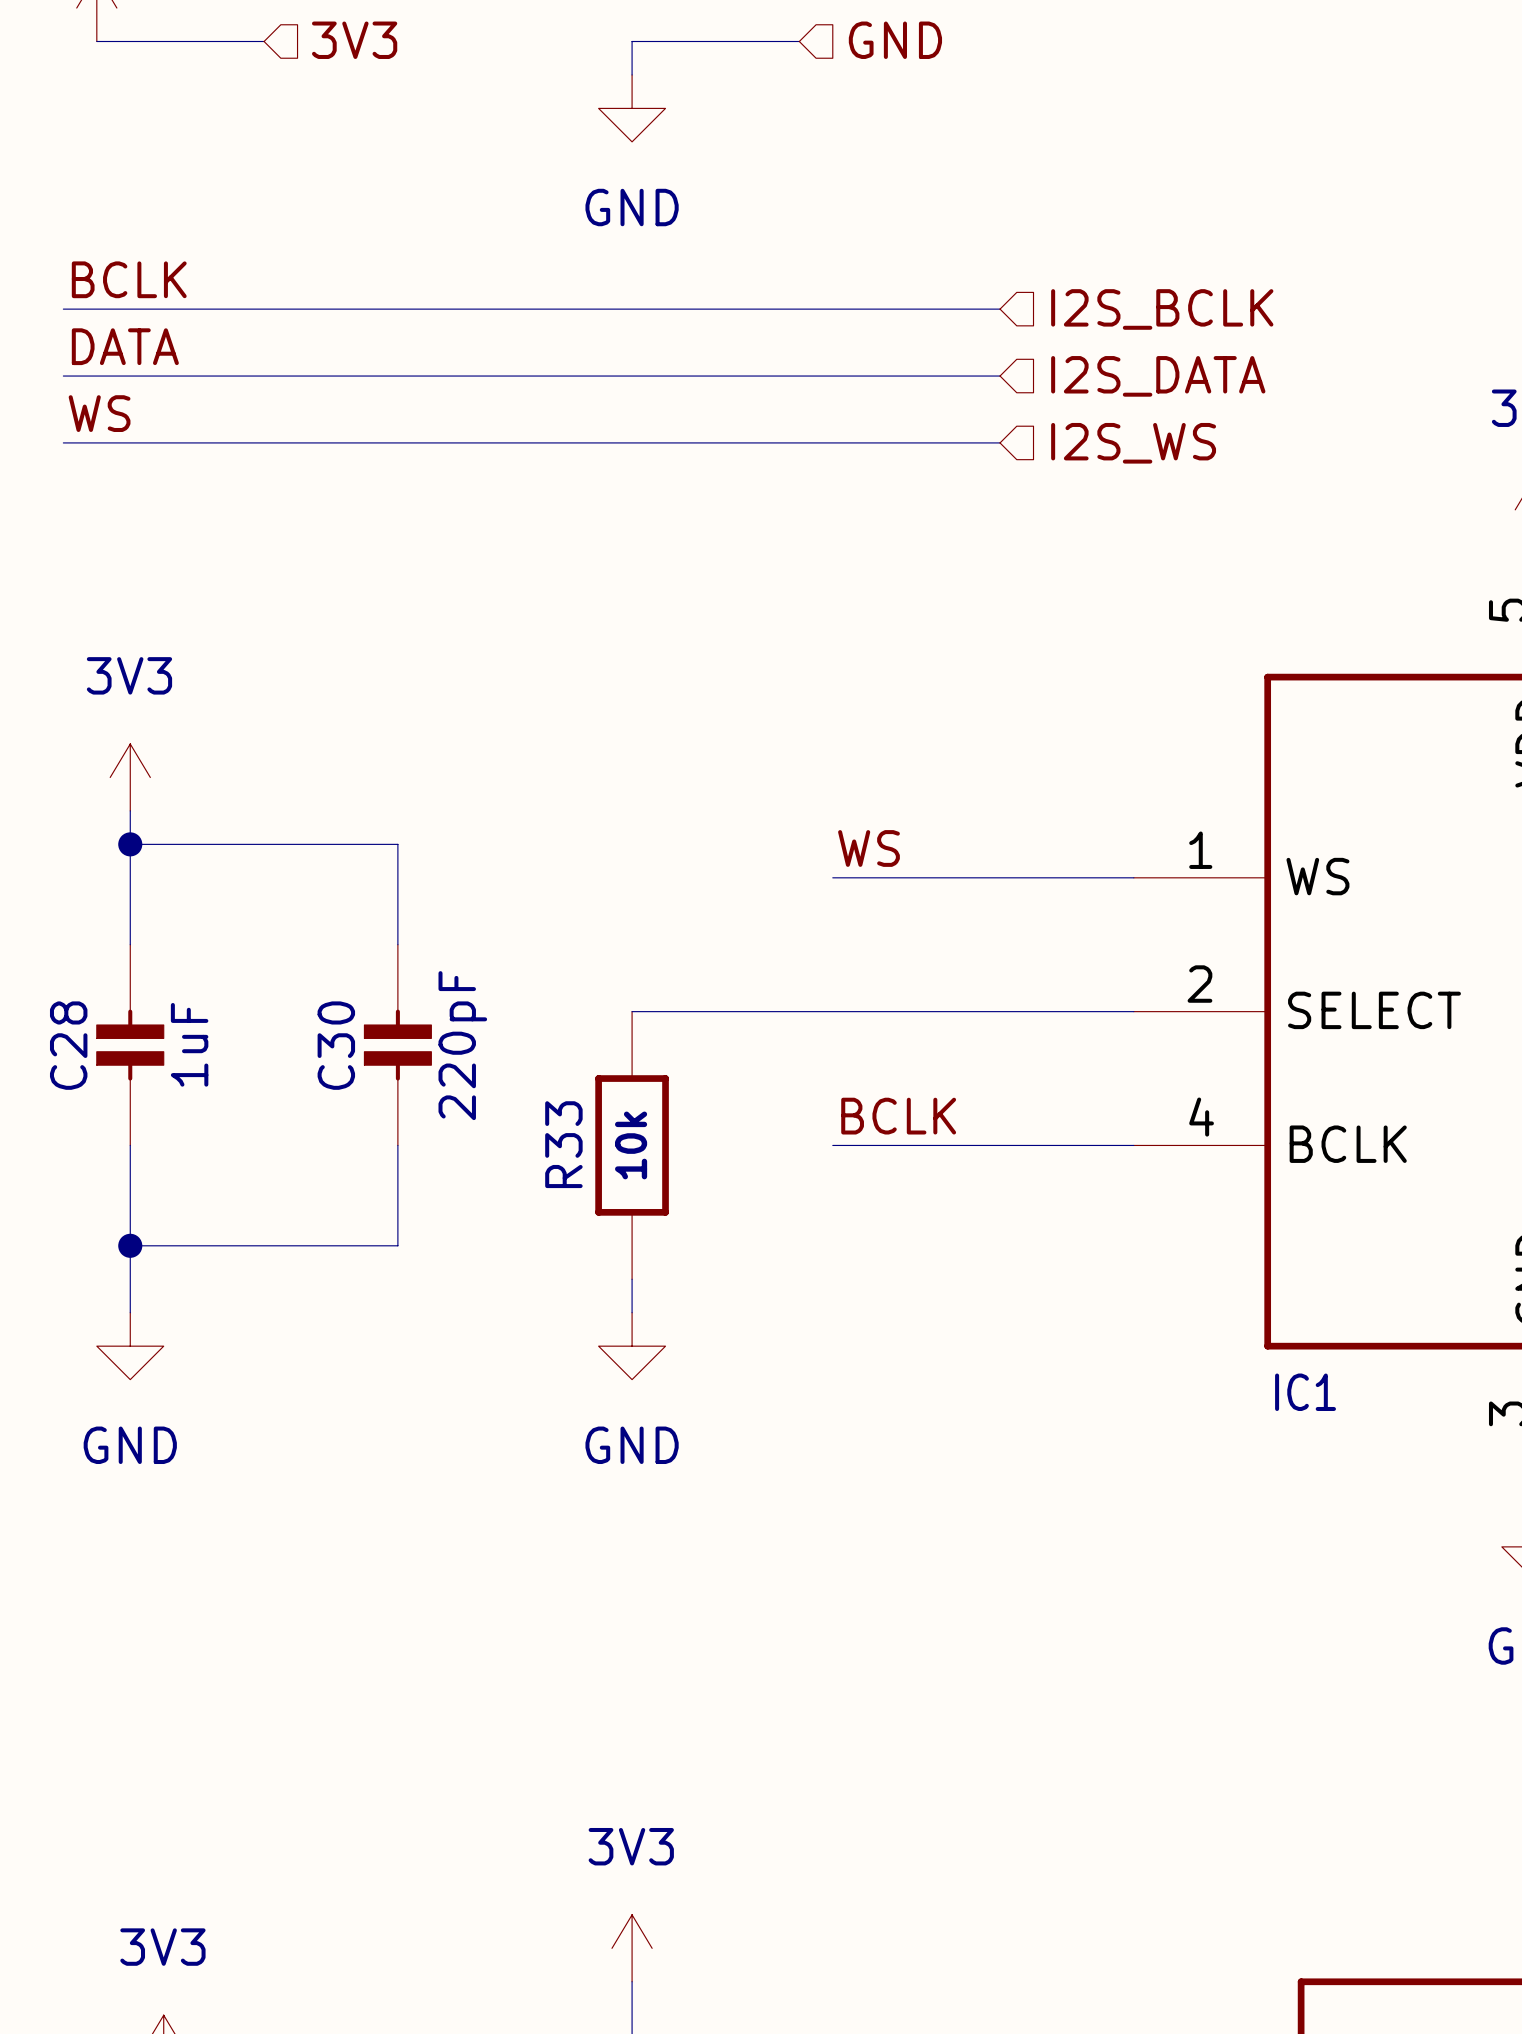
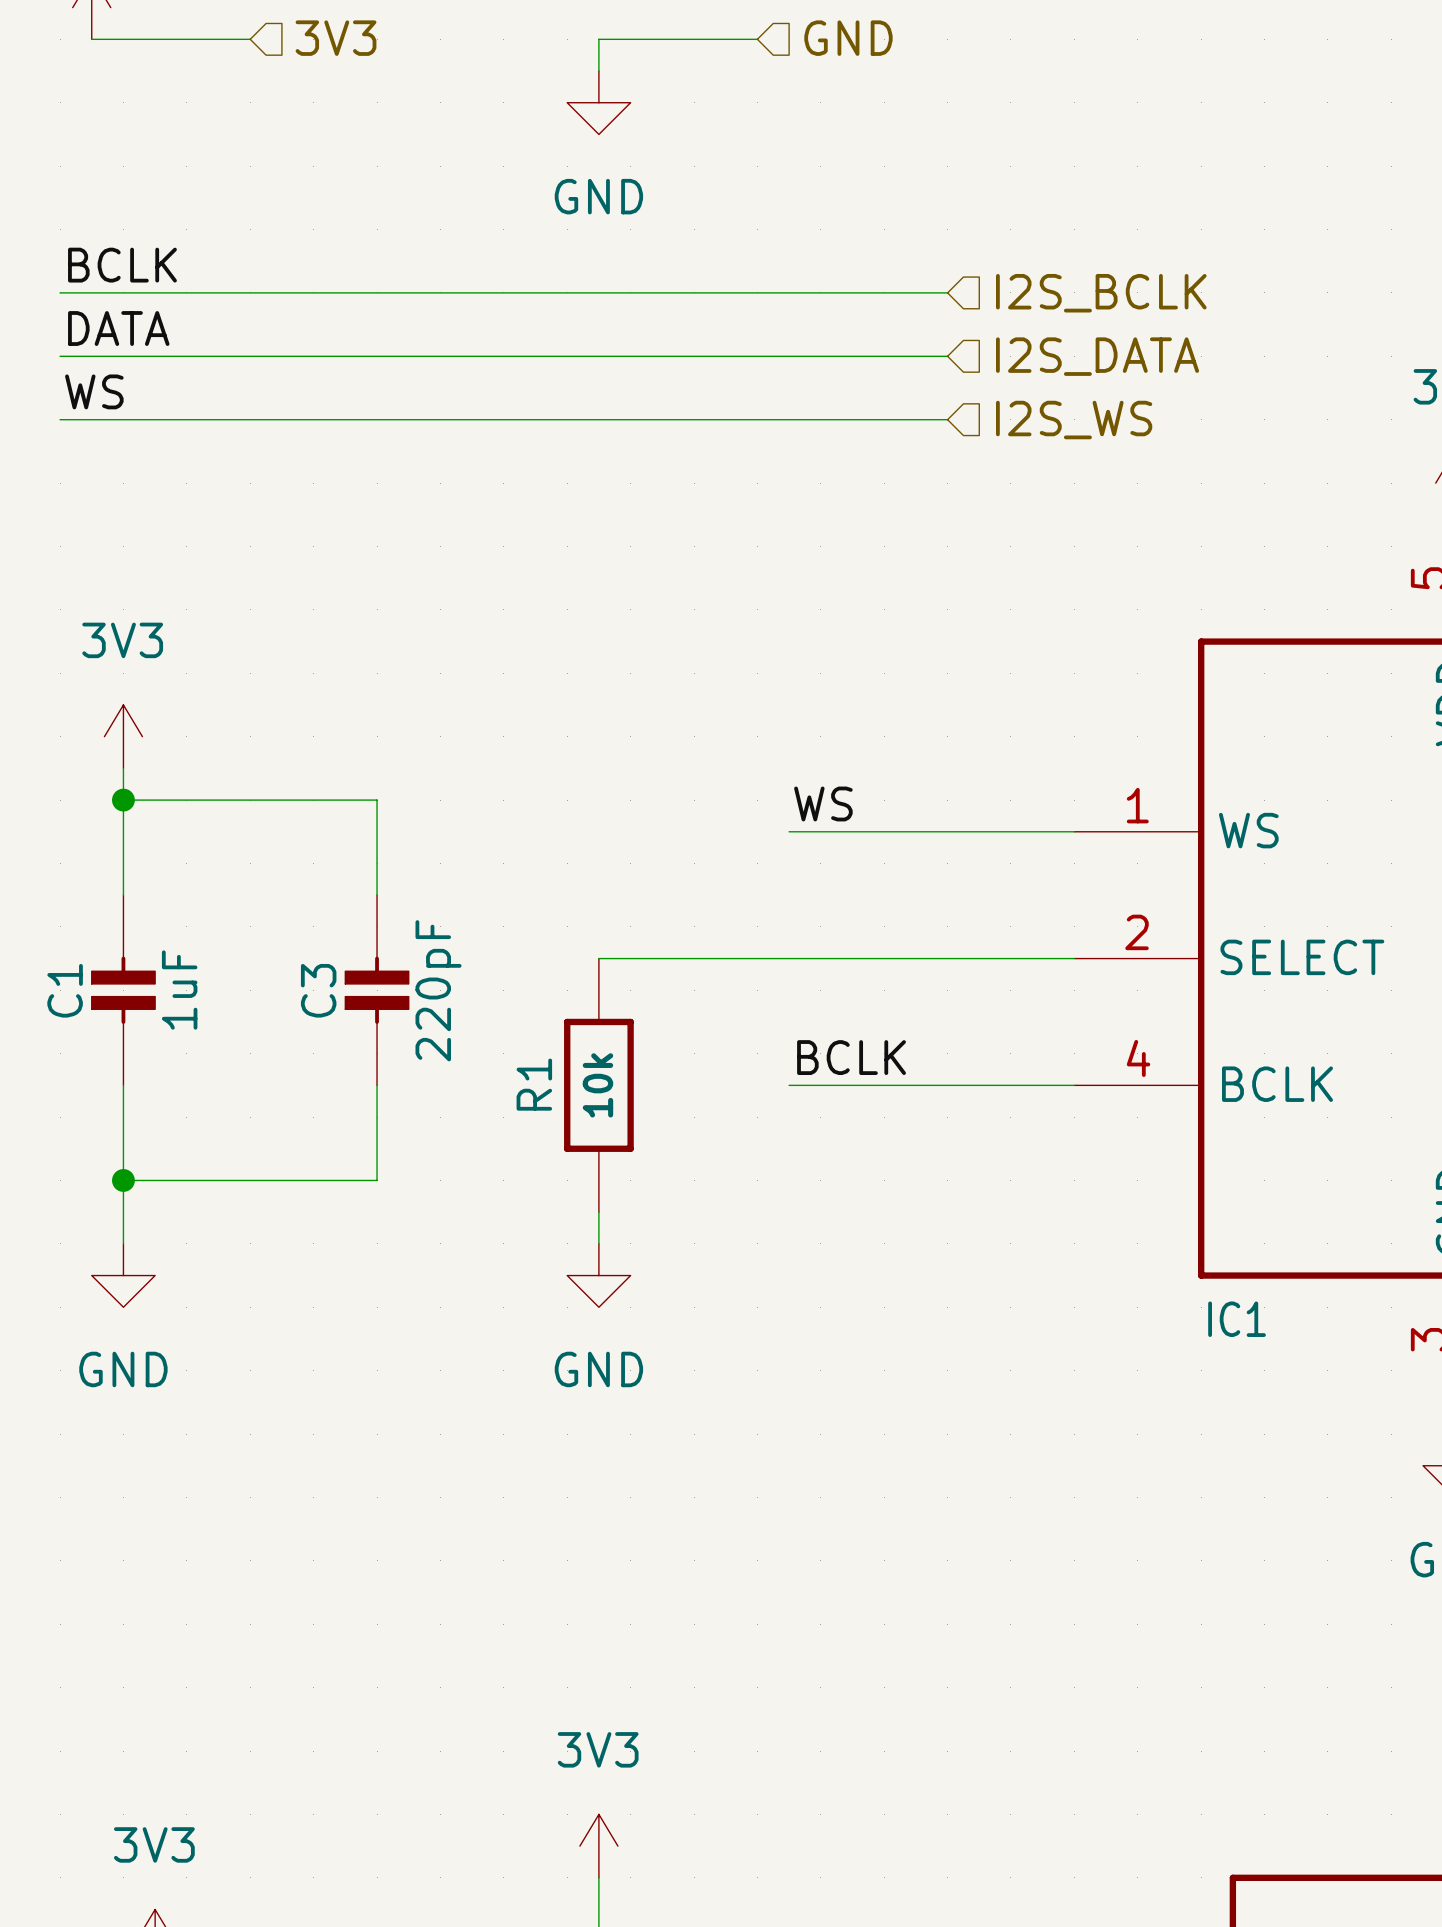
C28 name: C28 (68, 1045) -> C1 (65, 990)
C30 name: C30 (336, 1045) -> C3 (318, 990)
R33 name: R33 (563, 1144) -> R1 (534, 1084)

